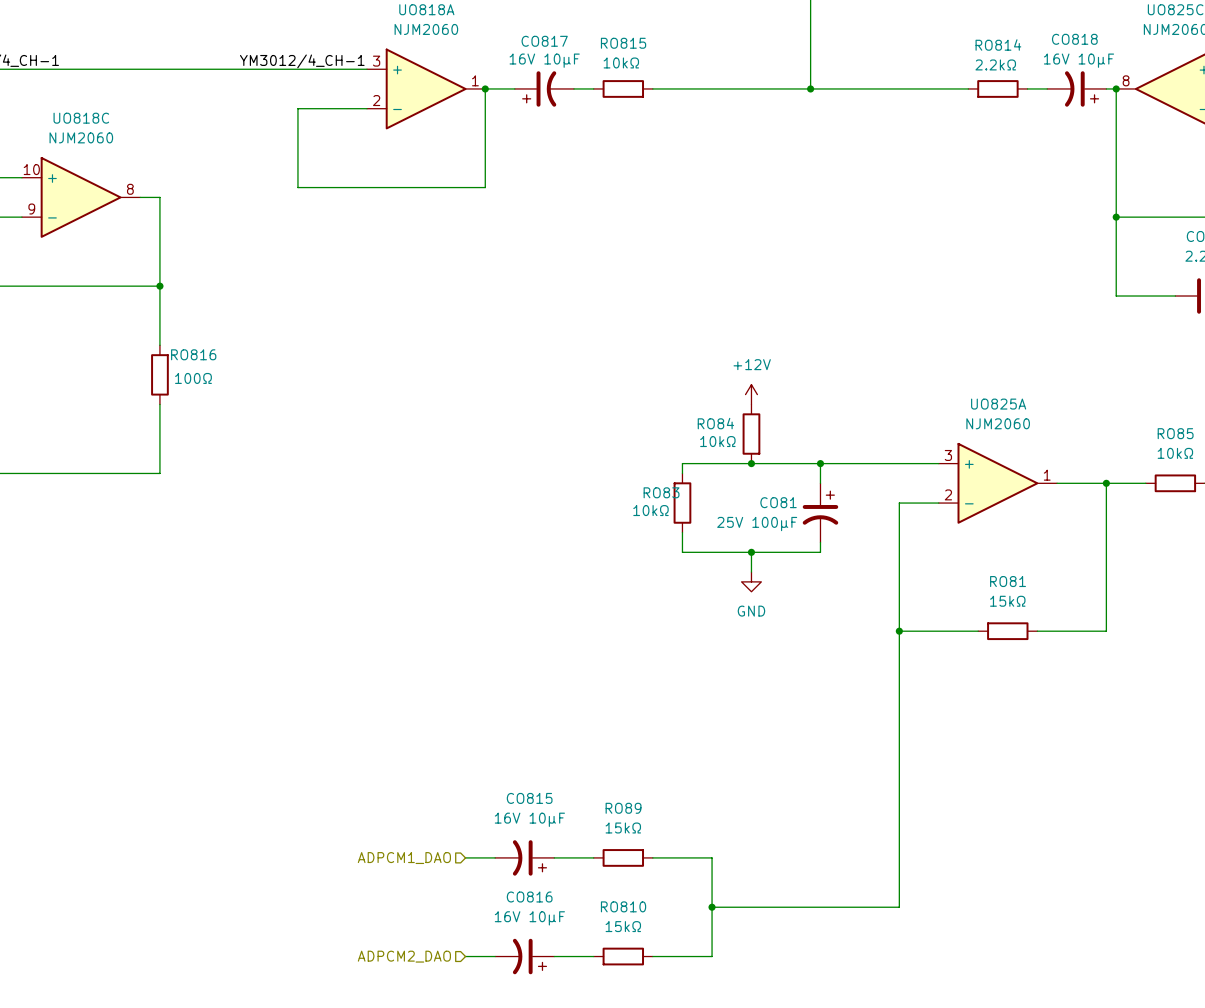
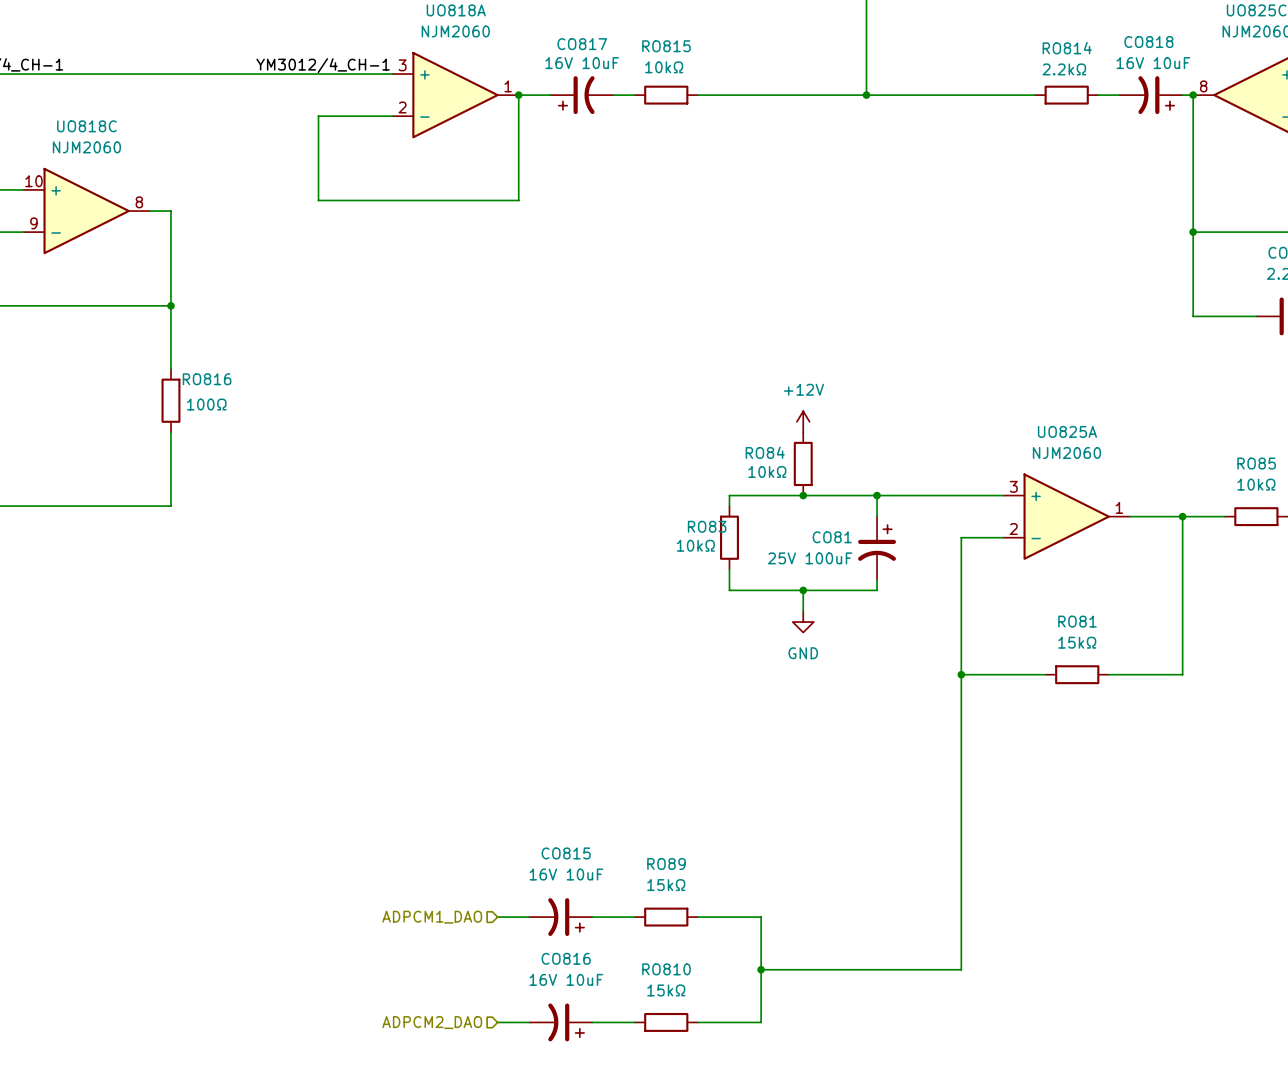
CO817 value: 16V 10μF (544, 60) -> 16V 10uF (582, 63)
CO818 value: 16V 10μF (1079, 60) -> 16V 10uF (1153, 63)
CO81 value: 25V 100μF (757, 524) -> 25V 100uF (810, 558)
CO815 value: 16V 10μF (529, 819) -> 16V 10uF (566, 874)
CO816 value: 16V 10μF (529, 918) -> 16V 10uF (566, 979)

